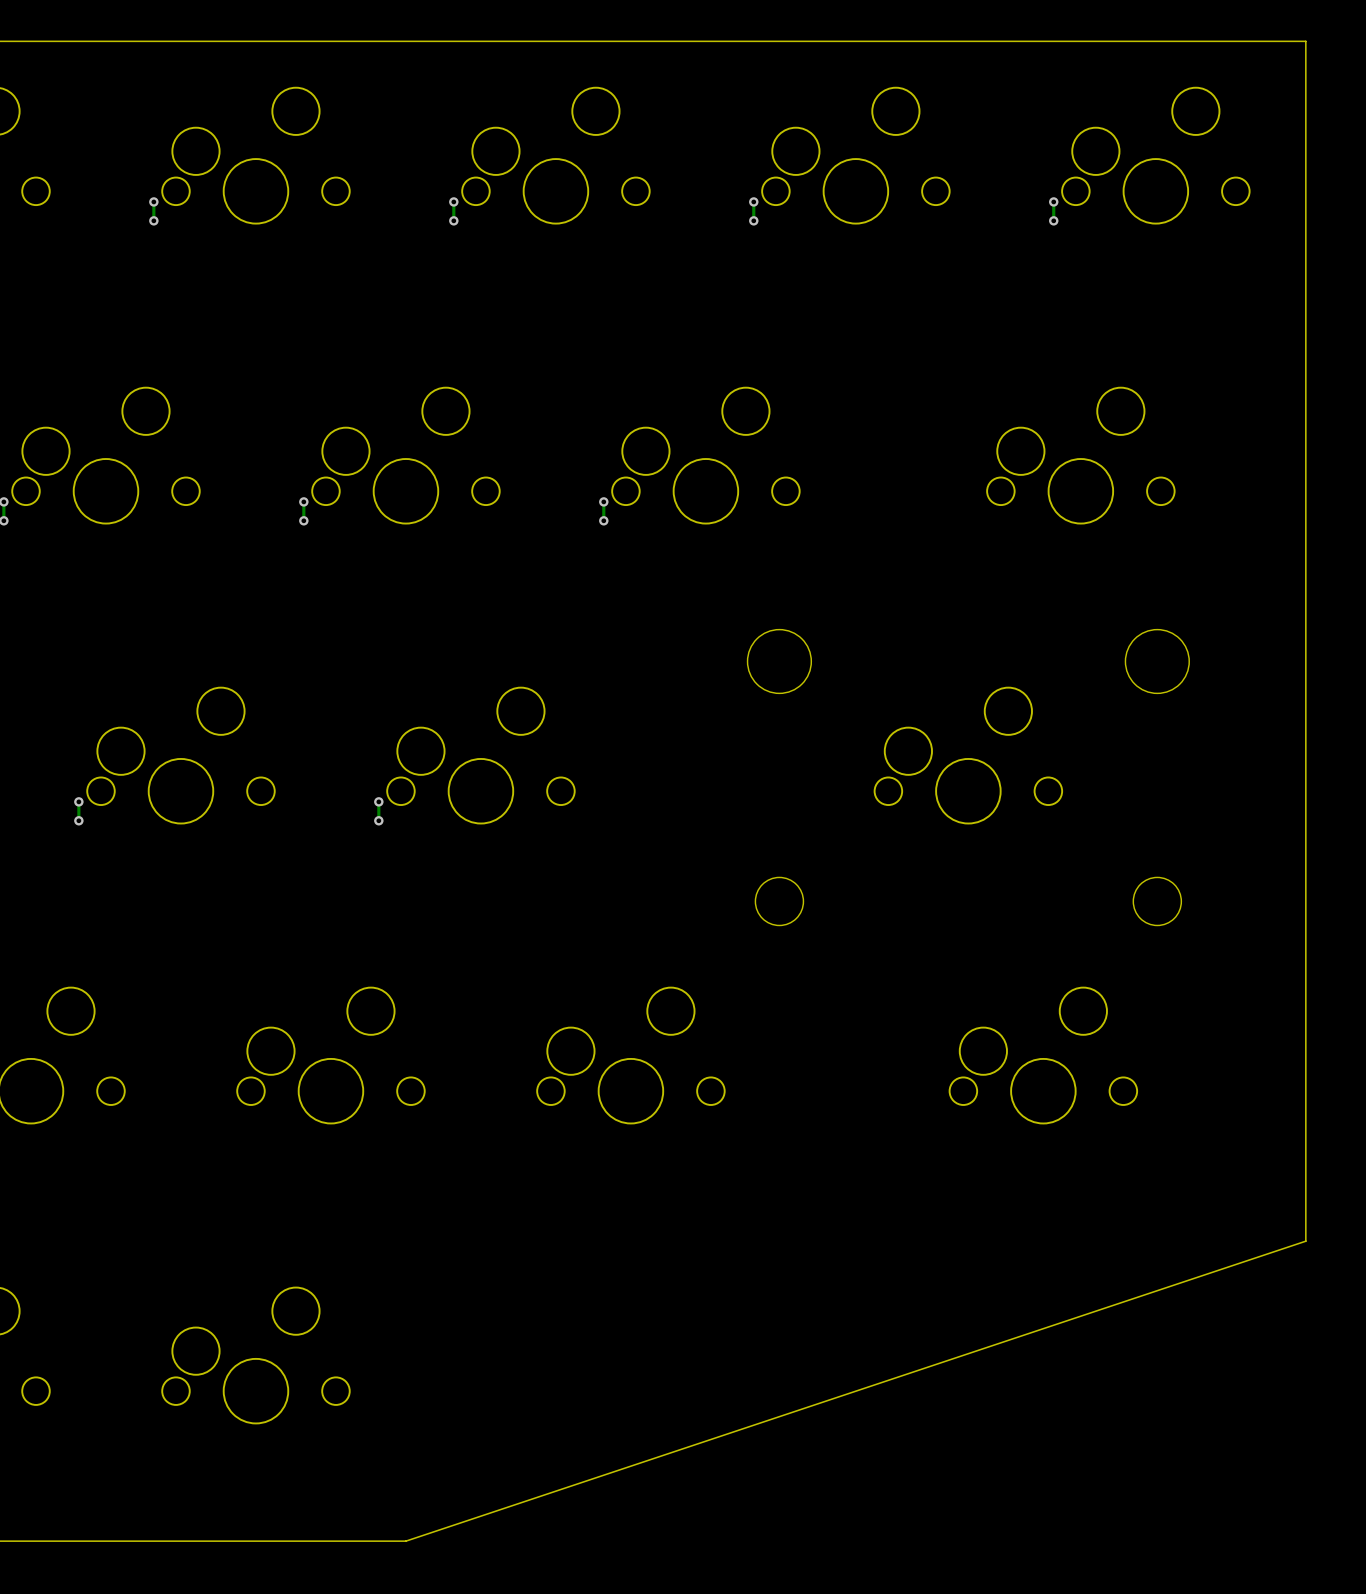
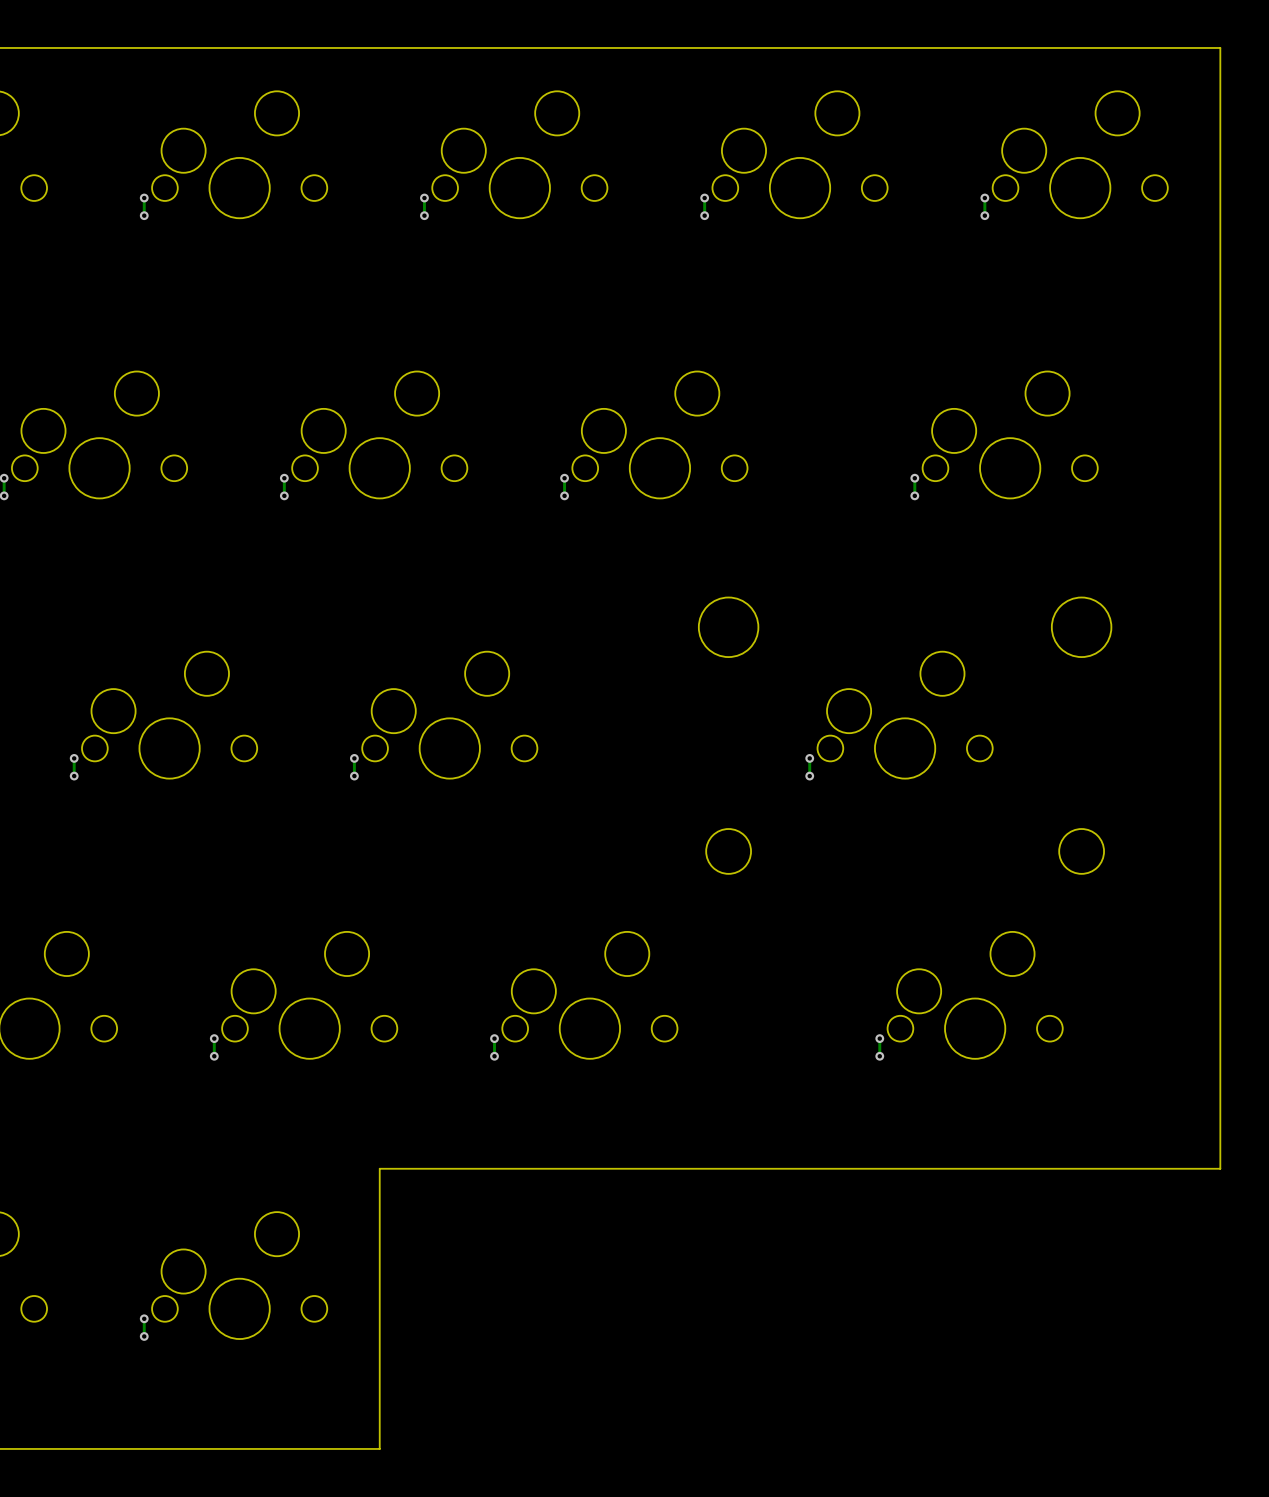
track: none -> (914, 478) (914, 495)
via: none -> (914, 478)
via: none -> (914, 495)
track: none -> (809, 758) (809, 776)
via: none -> (809, 758)
via: none -> (809, 776)
track: none -> (214, 1038) (214, 1056)
via: none -> (214, 1038)
track: none -> (494, 1038) (494, 1056)
via: none -> (494, 1038)
track: none -> (879, 1038) (879, 1056)
via: none -> (879, 1038)
via: none -> (214, 1056)
via: none -> (494, 1056)
via: none -> (879, 1056)
board edge: (1305, 1241) (405, 1541) -> (1220, 1168) (379, 1168) (379, 1448)
track: none -> (144, 1318) (144, 1336)
via: none -> (144, 1318)
via: none -> (144, 1336)

